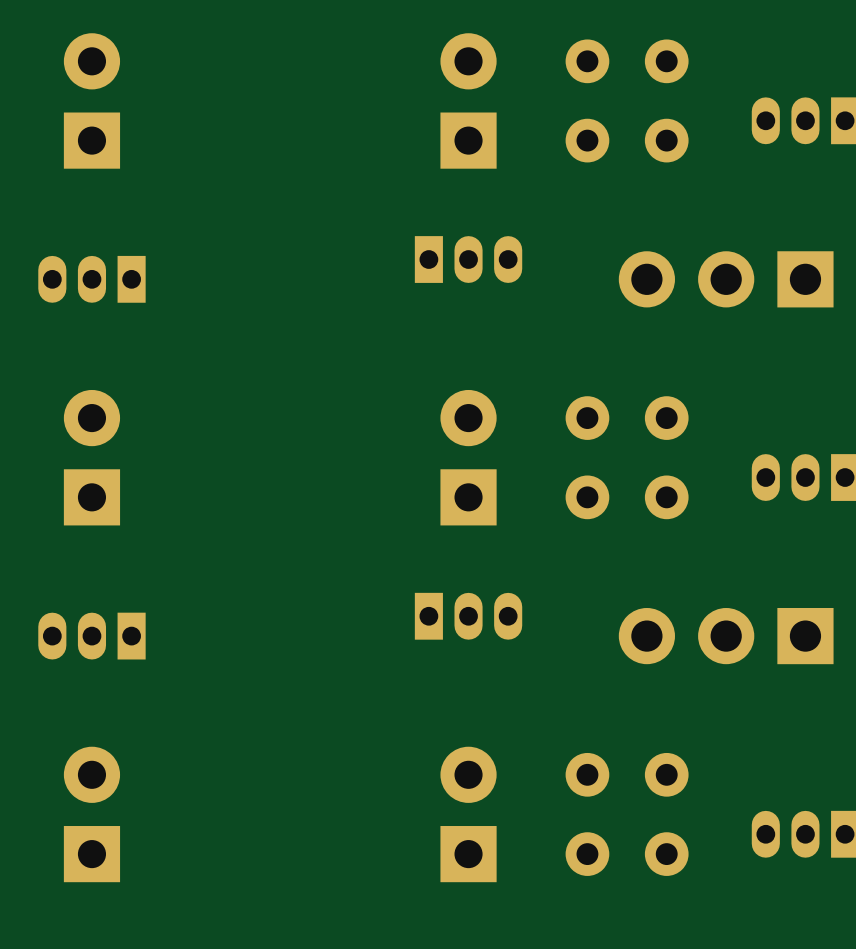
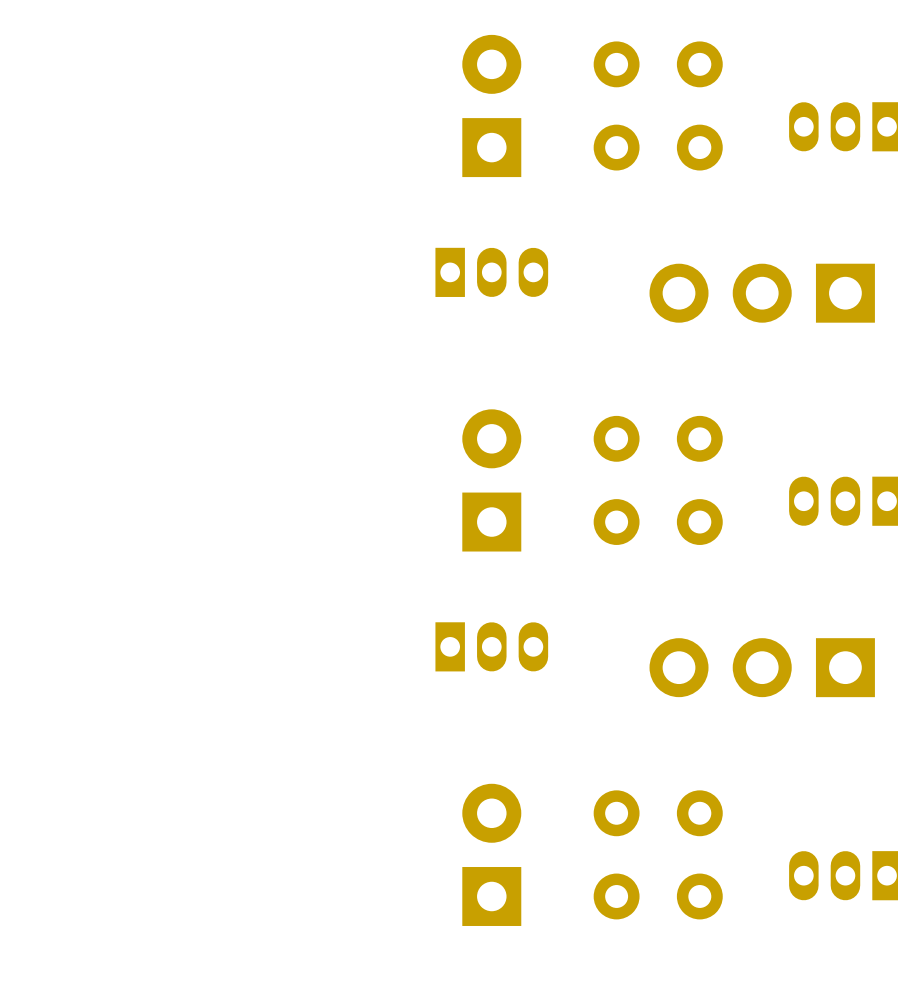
part: (91, 100) -> none
part: (91, 279) -> none
part: (91, 457) -> none
part: (91, 636) -> none
part: (91, 814) -> none

